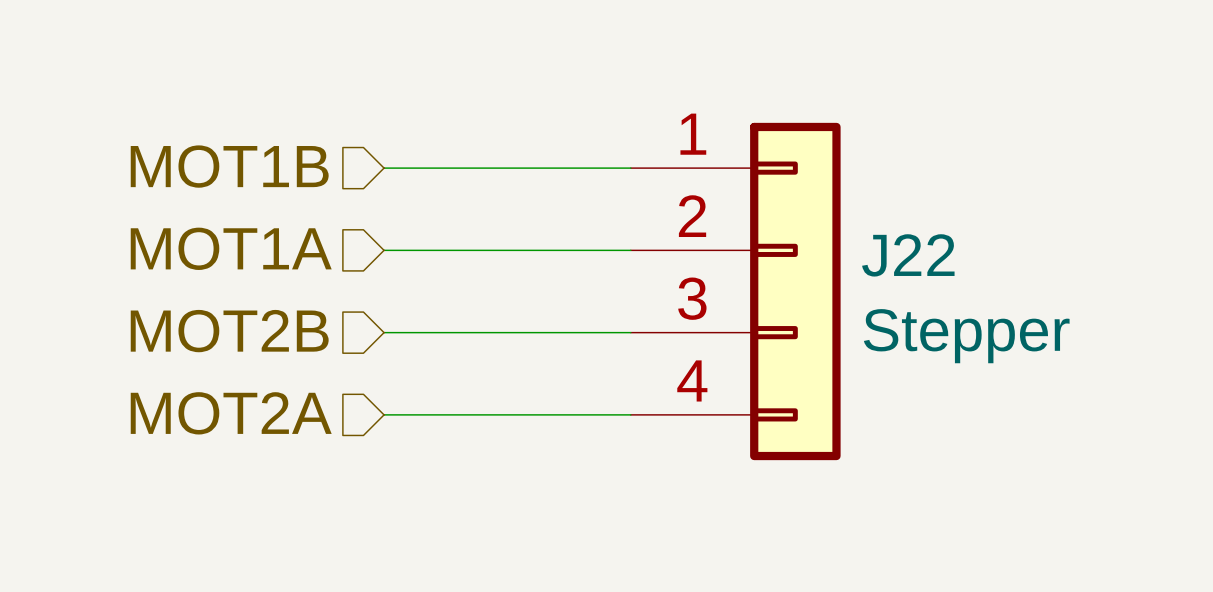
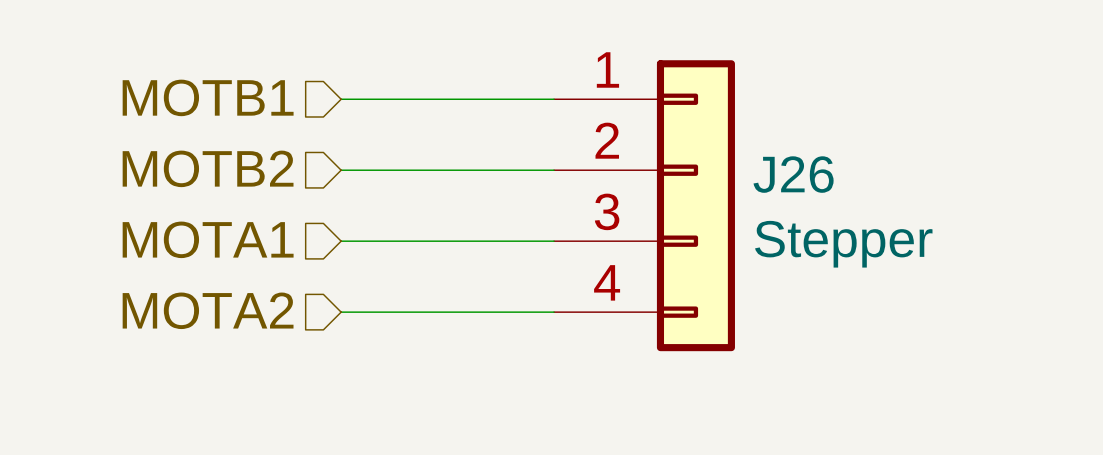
hierarchical label: MOT1B (229, 166) -> MOTB1 (208, 97)
hierarchical label: MOT1A (231, 248) -> MOTB2 (208, 168)
J22 name: J22 (908, 255) -> J26 (793, 174)
hierarchical label: MOT2B (229, 331) -> MOTA1 (208, 239)
hierarchical label: MOT2A (231, 413) -> MOTA2 (208, 310)

